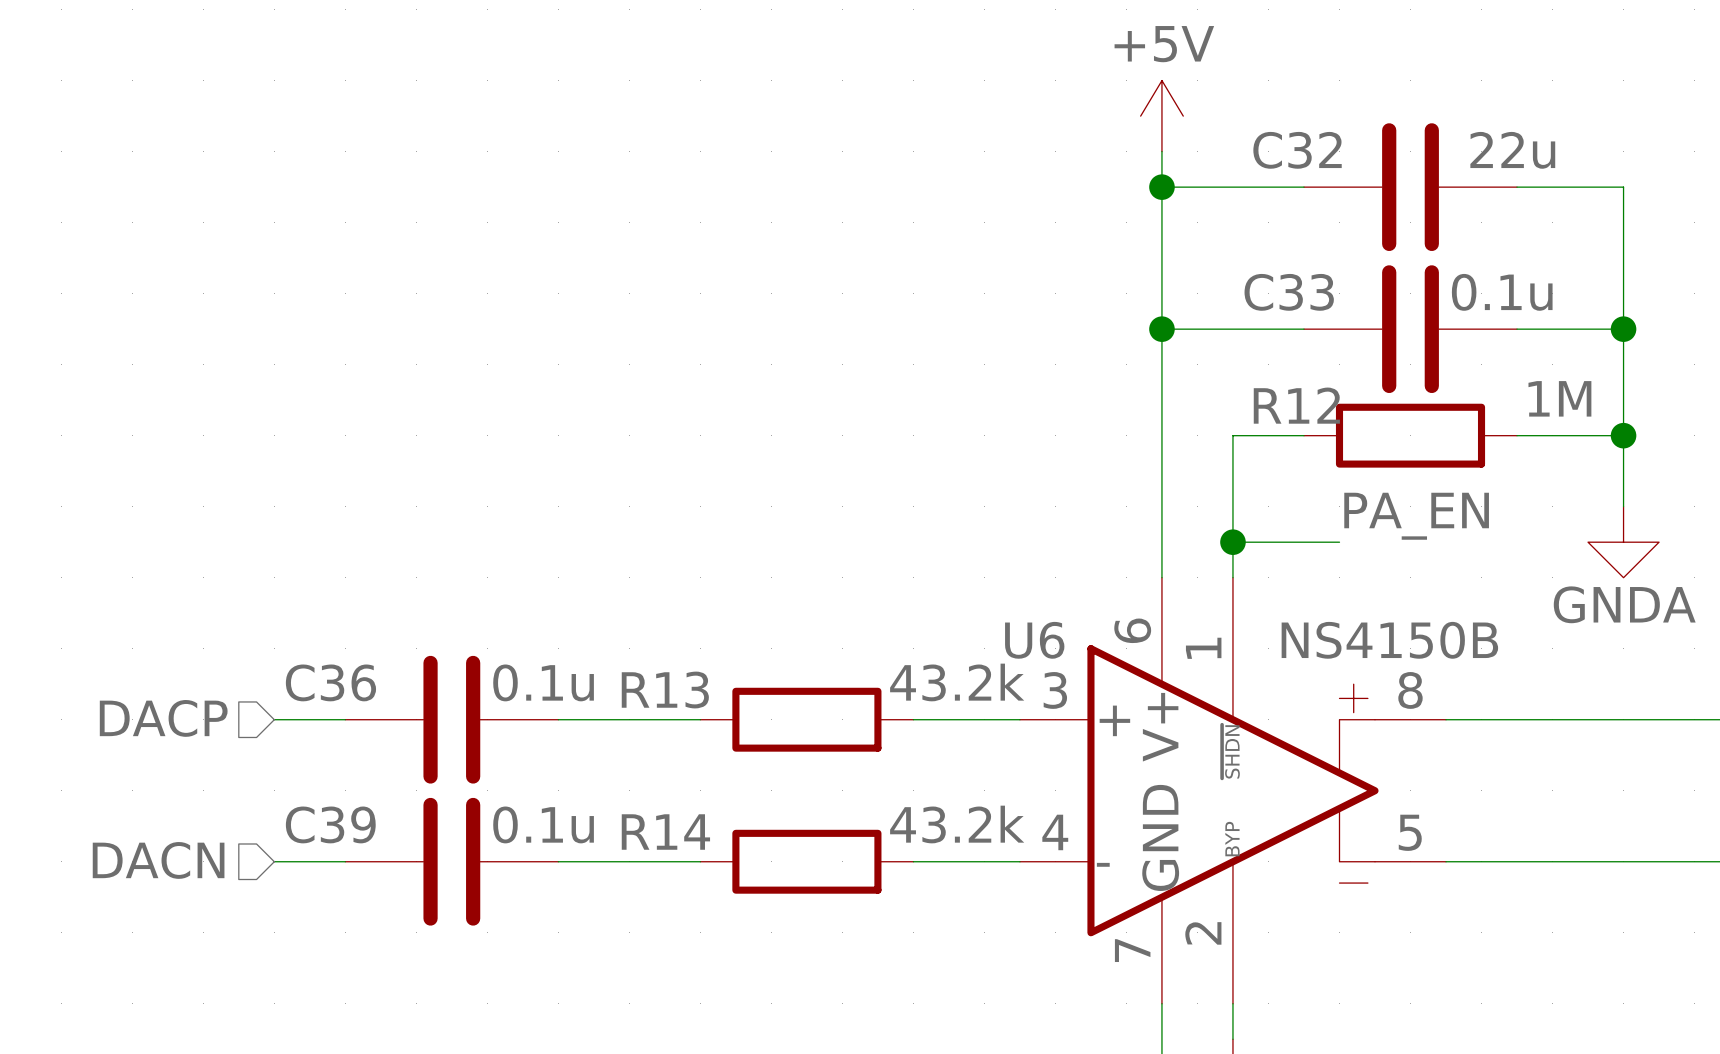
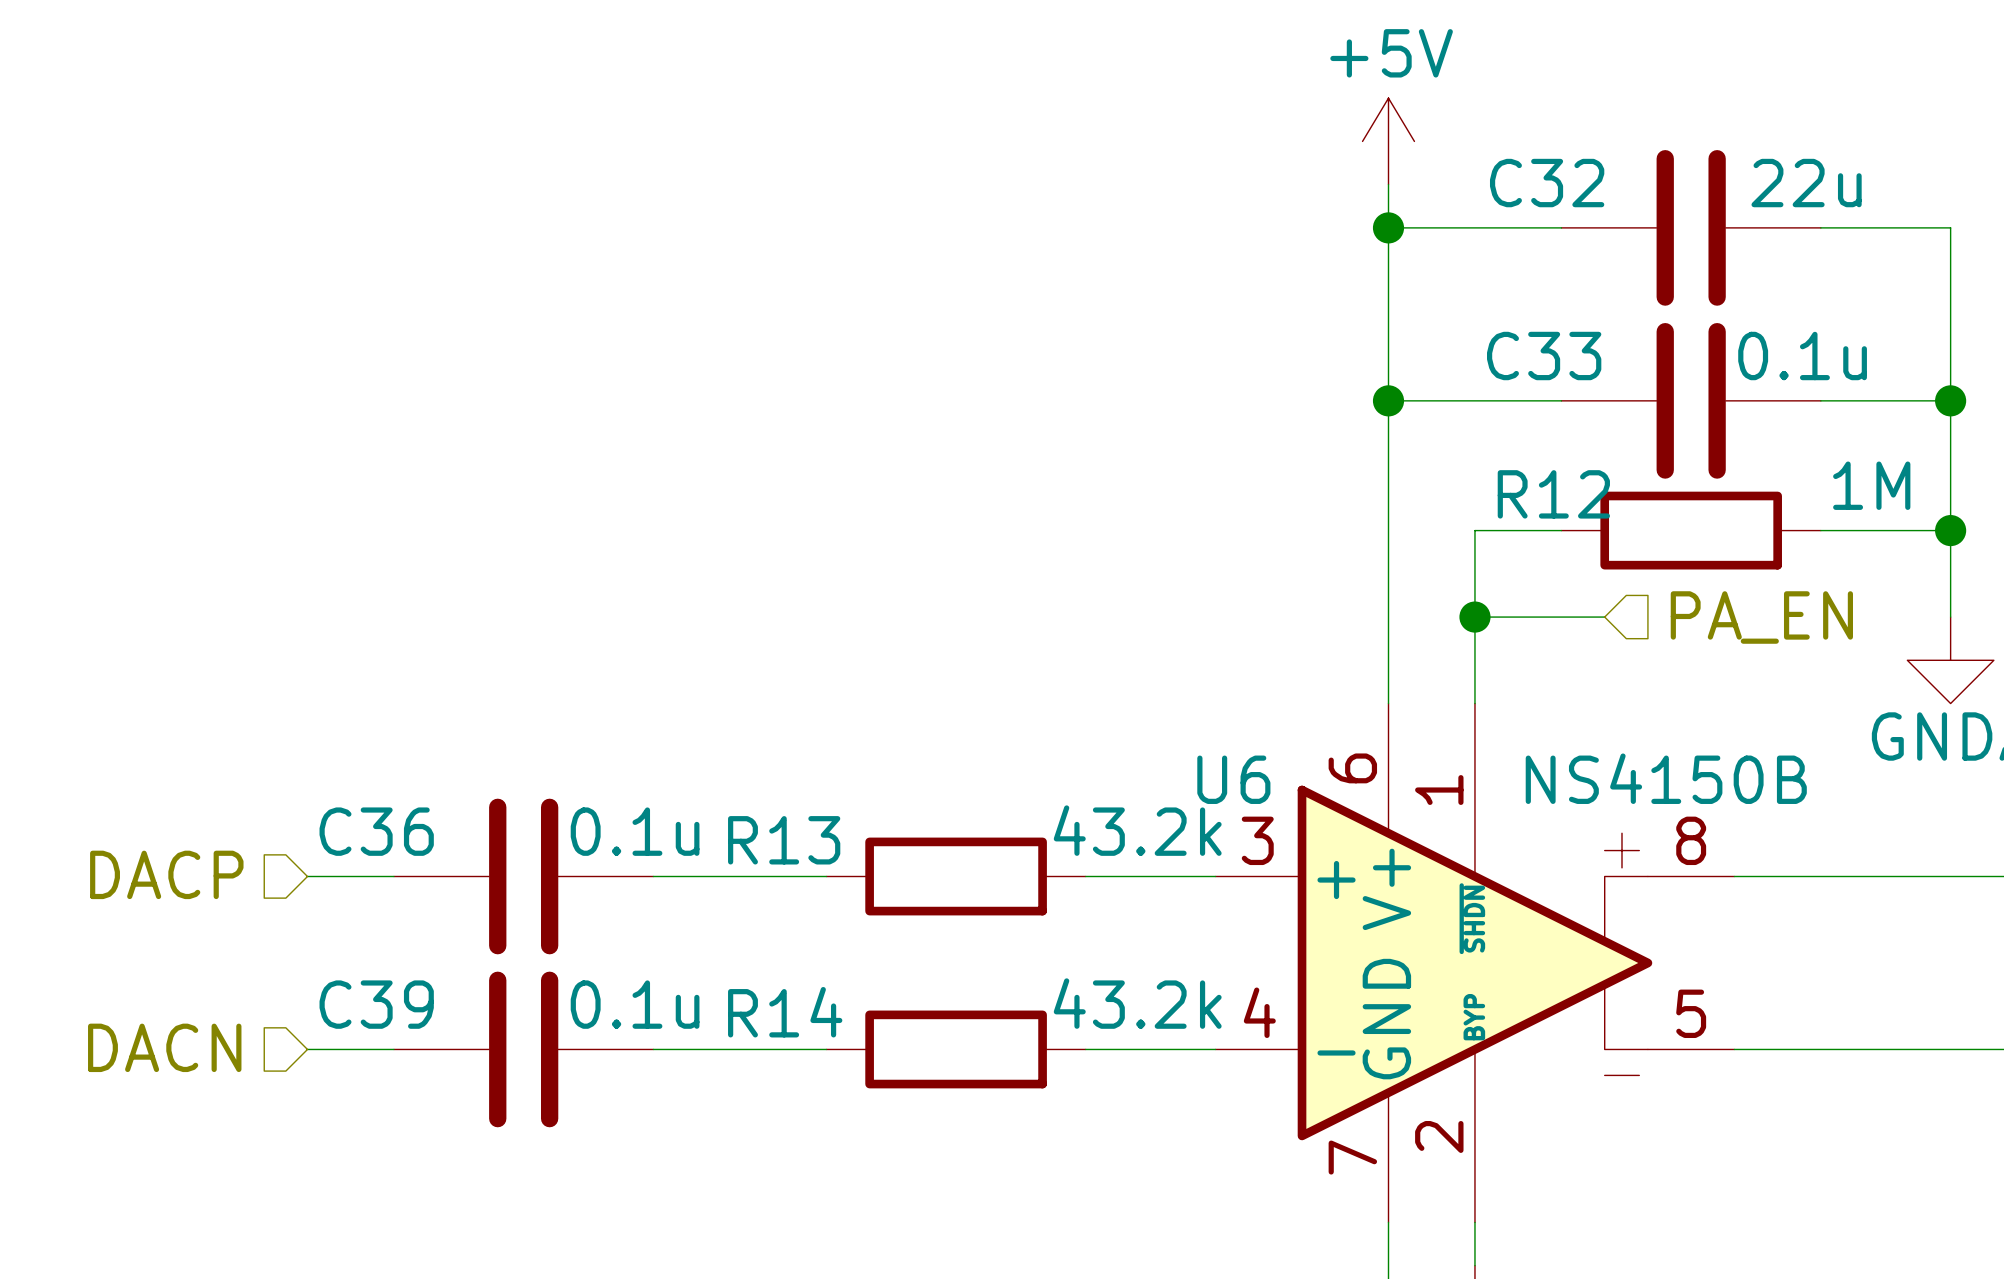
hierarchical label: none -> PA_EN (1761, 617)
label: PA_EN (1416, 516) -> none
wire: (1232, 542) (1339, 542) -> (1474, 617) (1604, 617)
junction position: (1232, 542) -> (1474, 617)

